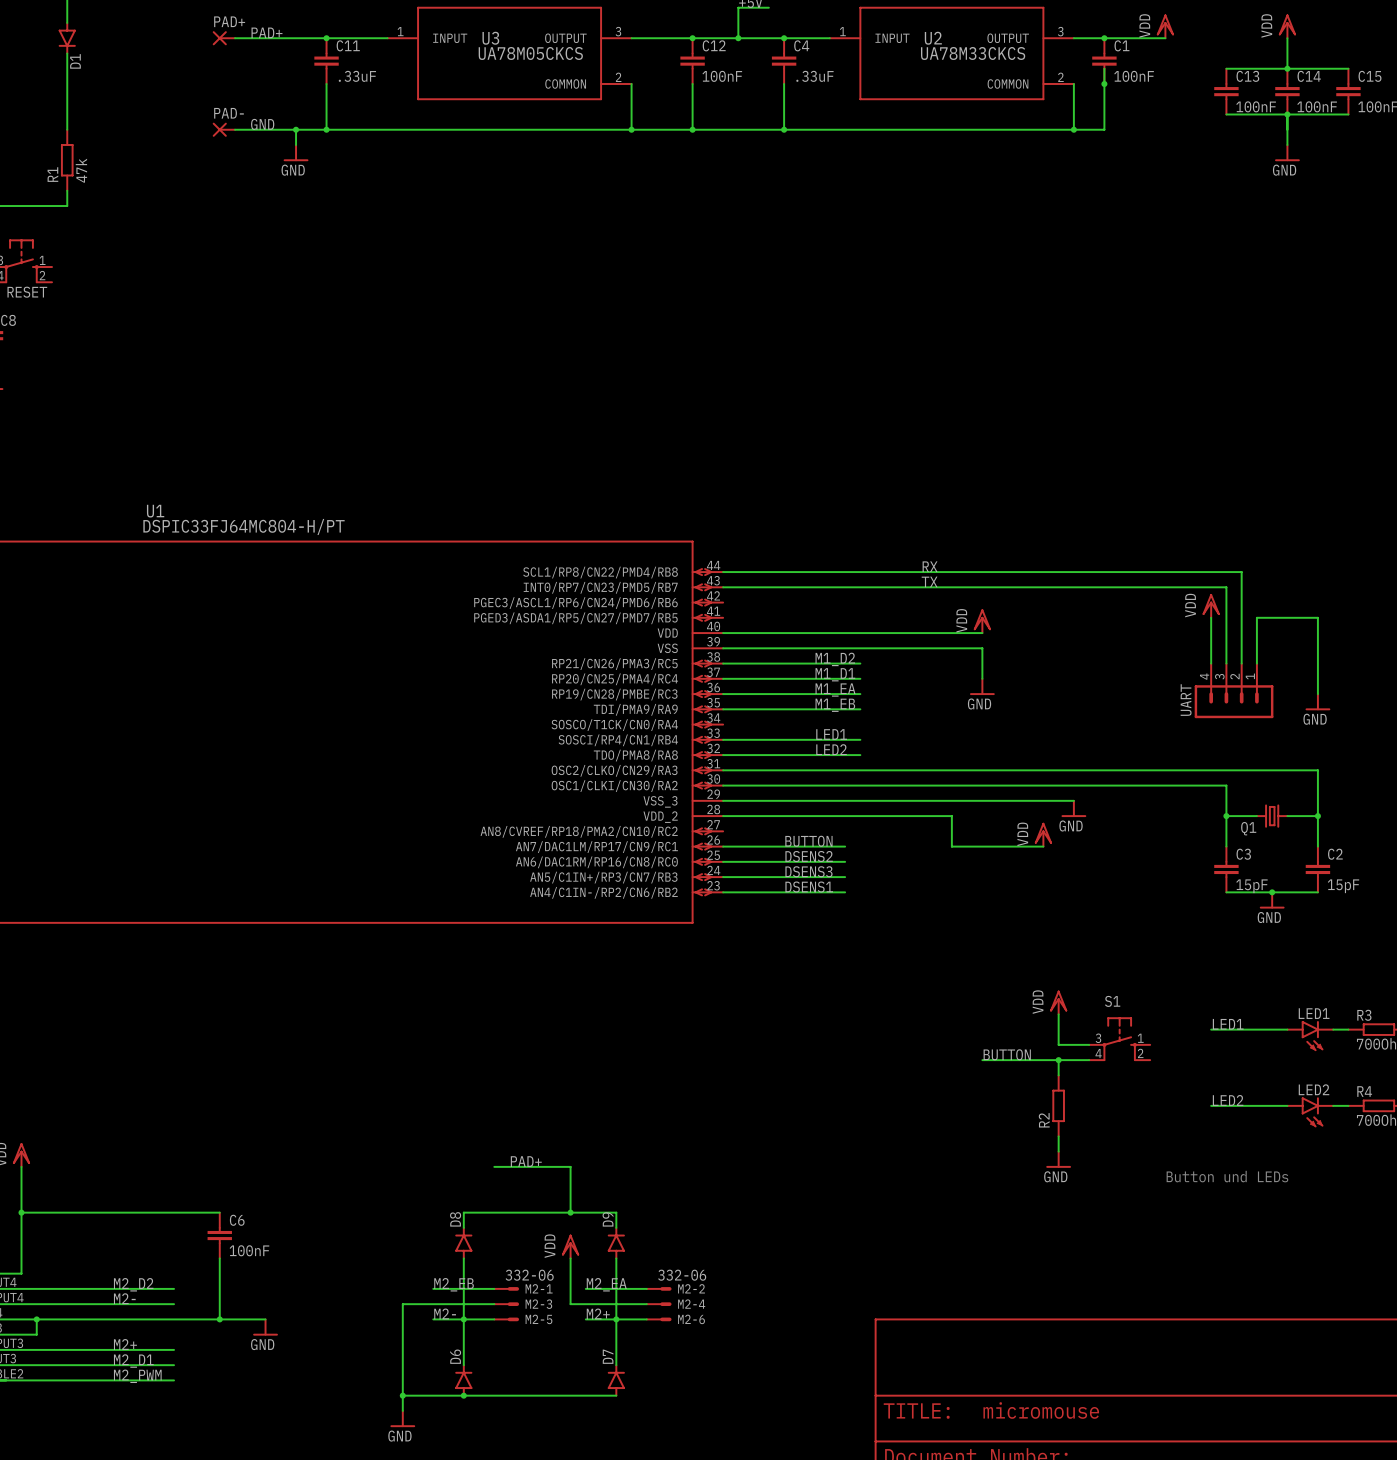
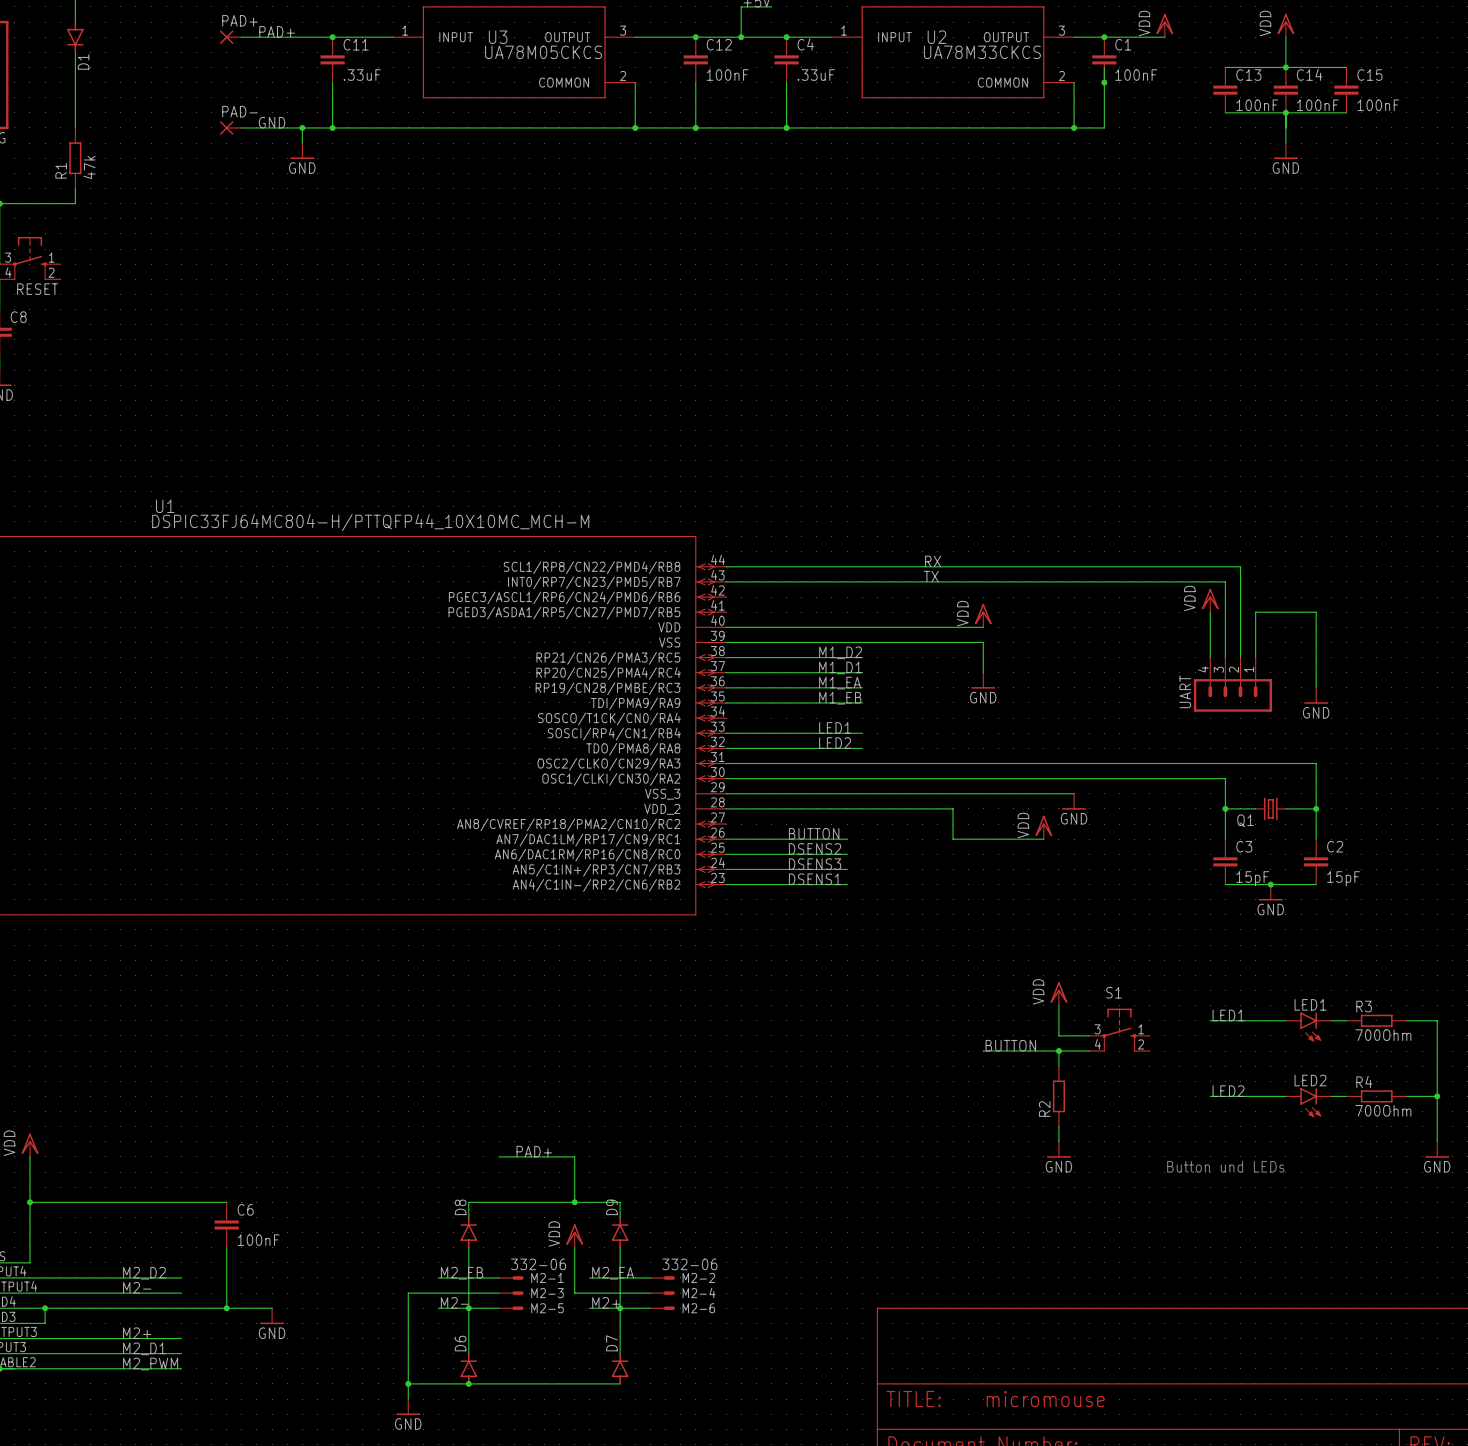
U1 value: DSPIC33FJ64MC804-H/PT (244, 526) -> DSPIC33FJ64MC804-H/PTTQFP44_10X10MC_MCH-M (370, 522)

